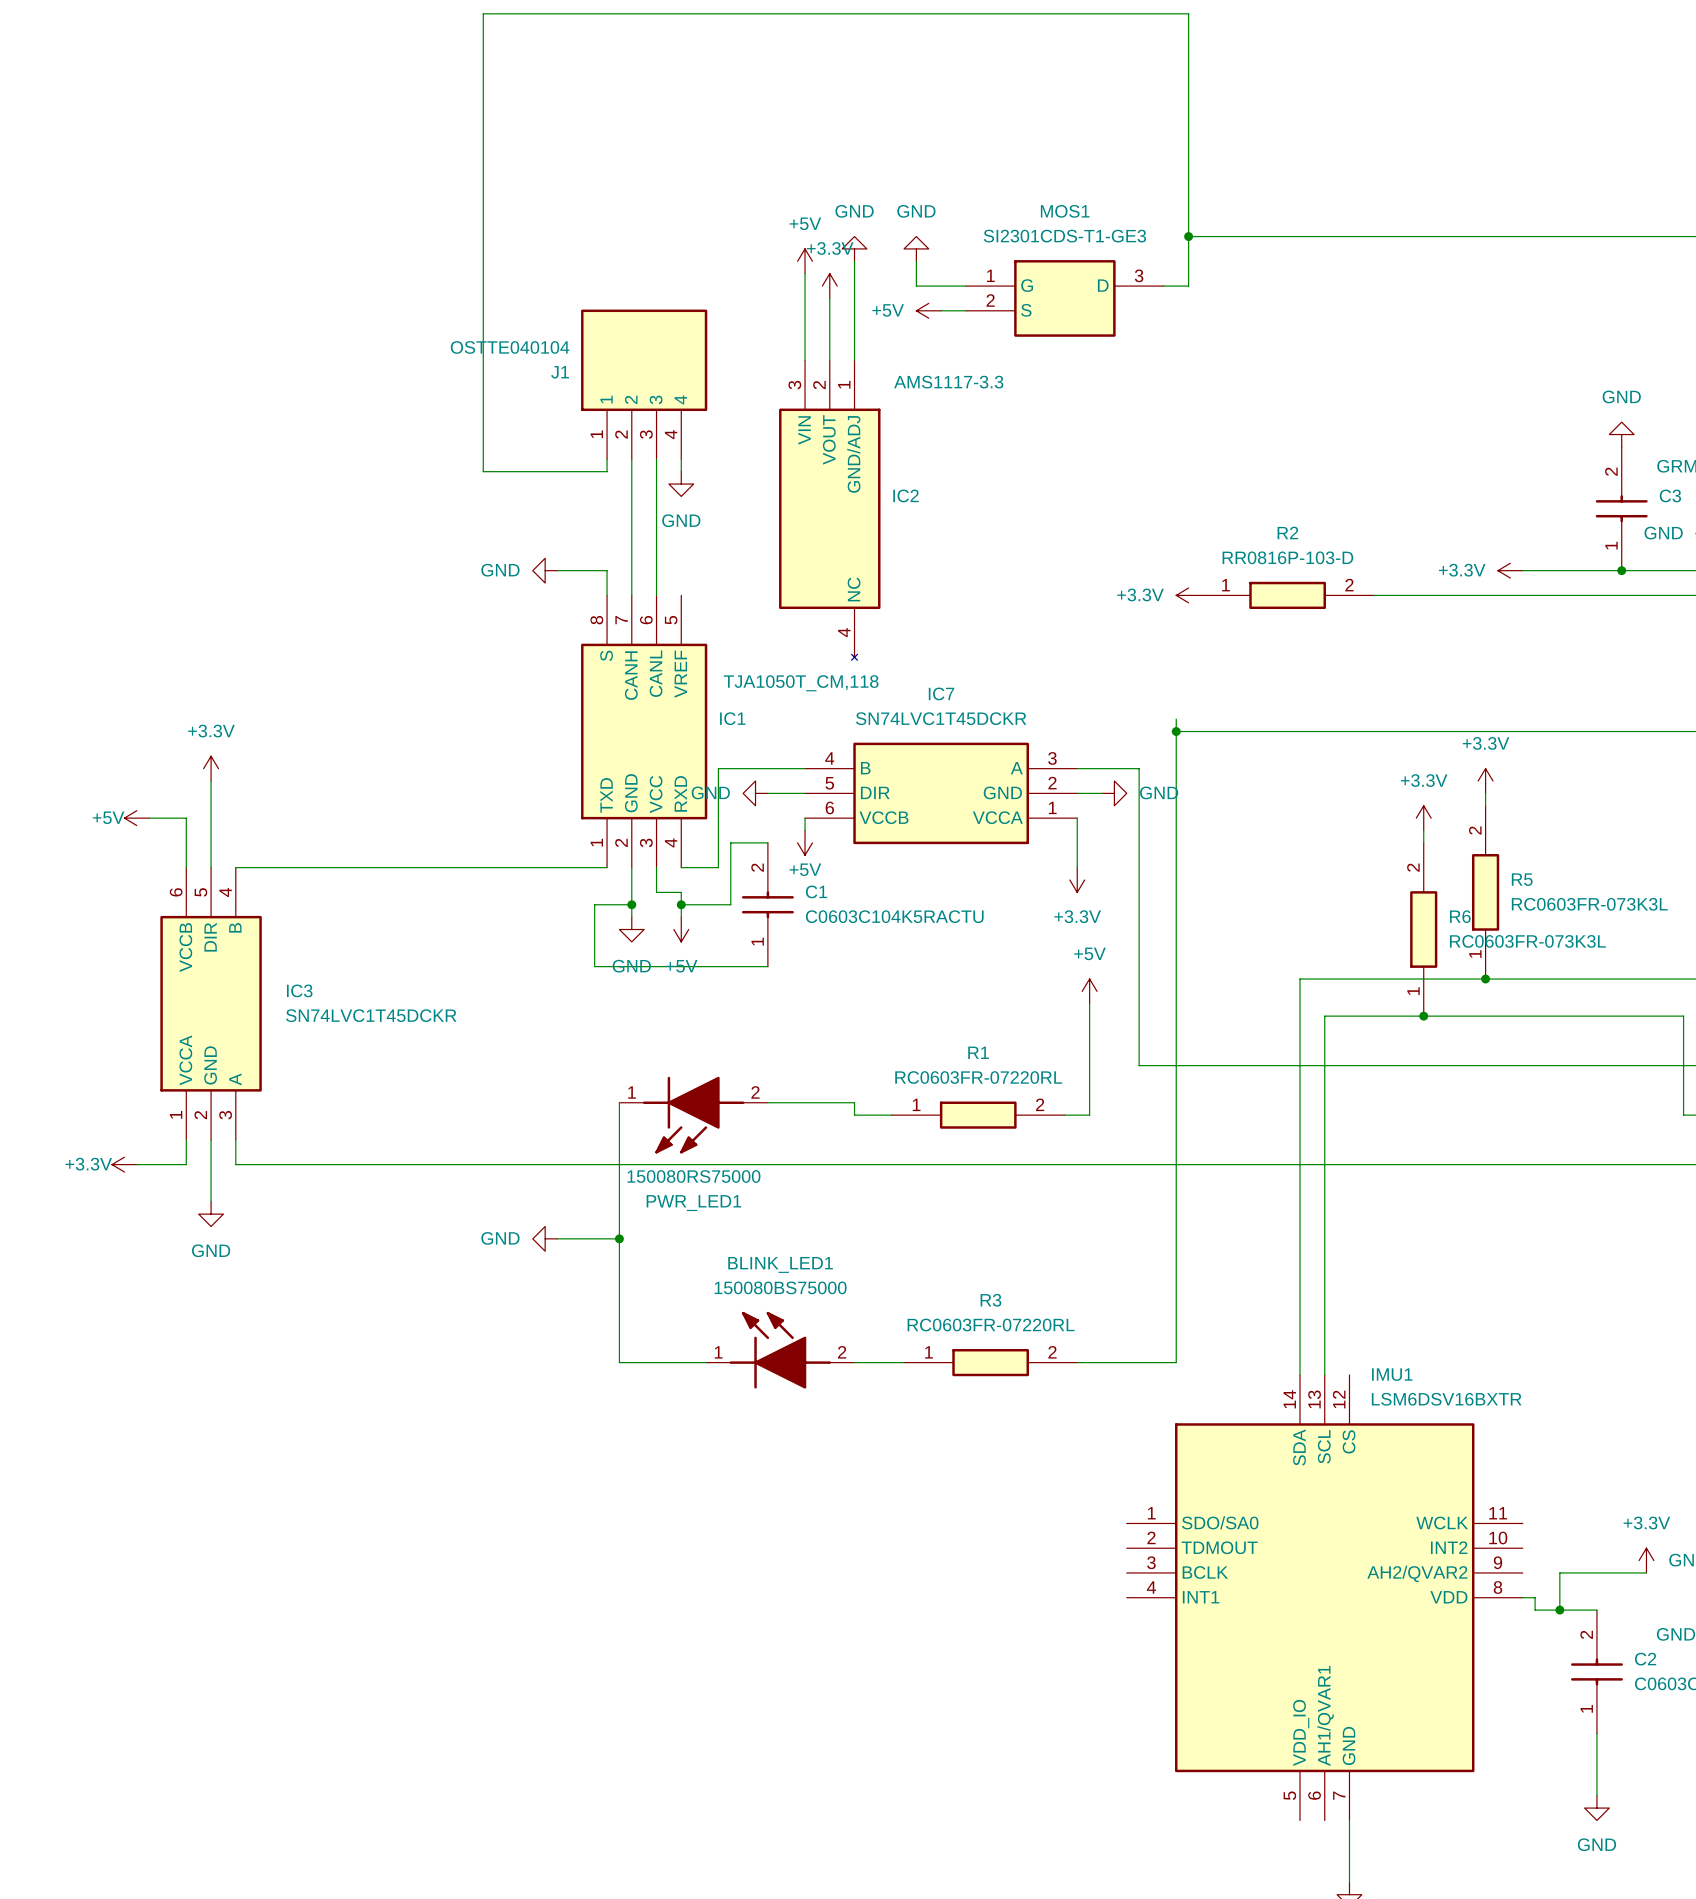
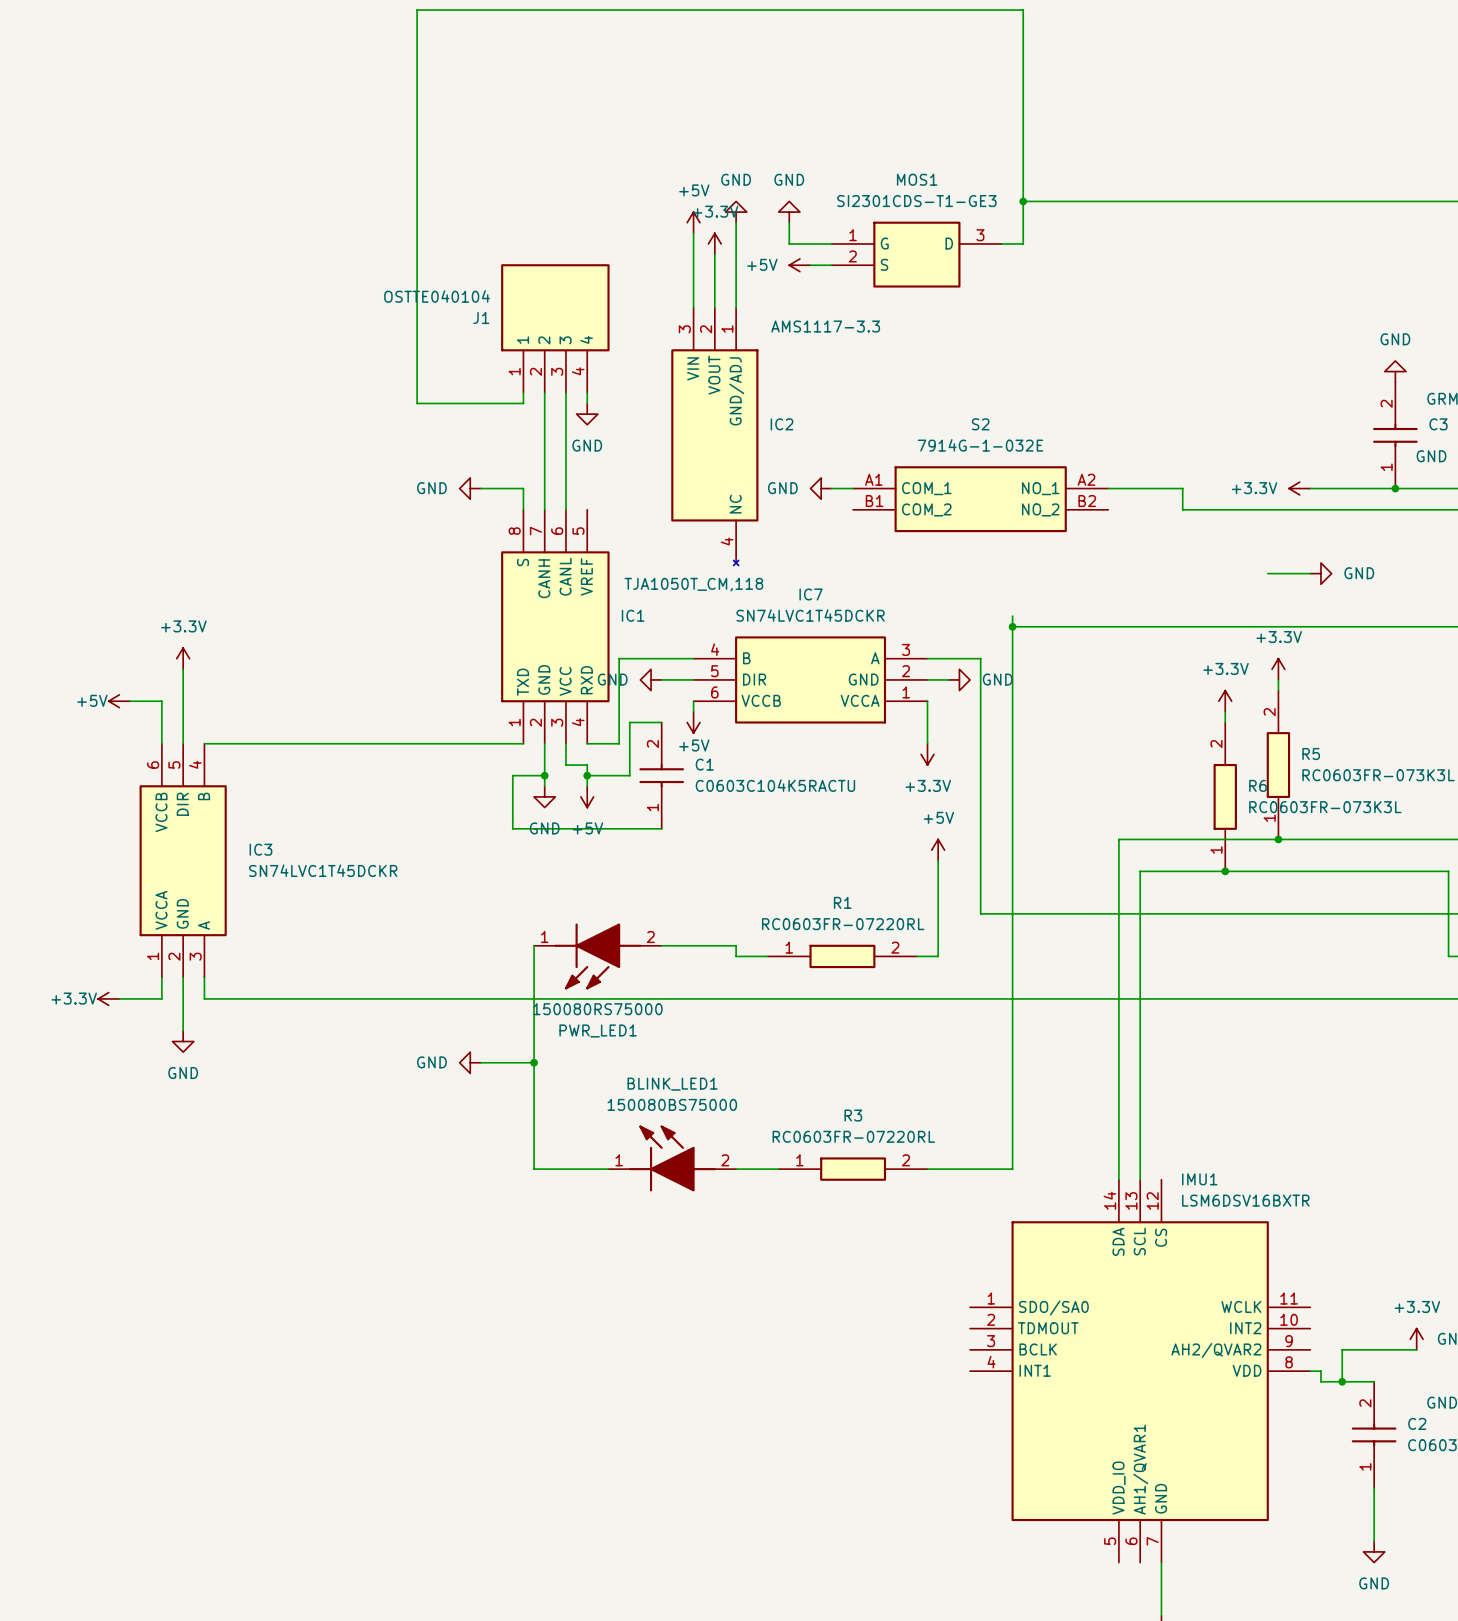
power symbol: none -> GND (821, 488)
wire: none -> (831, 488) (853, 488)
wire: none -> (1108, 488) (1182, 488) (1182, 509)
S2: none -> 7914G-1-032E (980, 499)
power symbol: +3.3V (1188, 595) -> none
R2: RR0816P-103-D (1287, 595) -> none
wire: none -> (1267, 573) (1310, 573)
power symbol: none -> GND (1320, 573)

